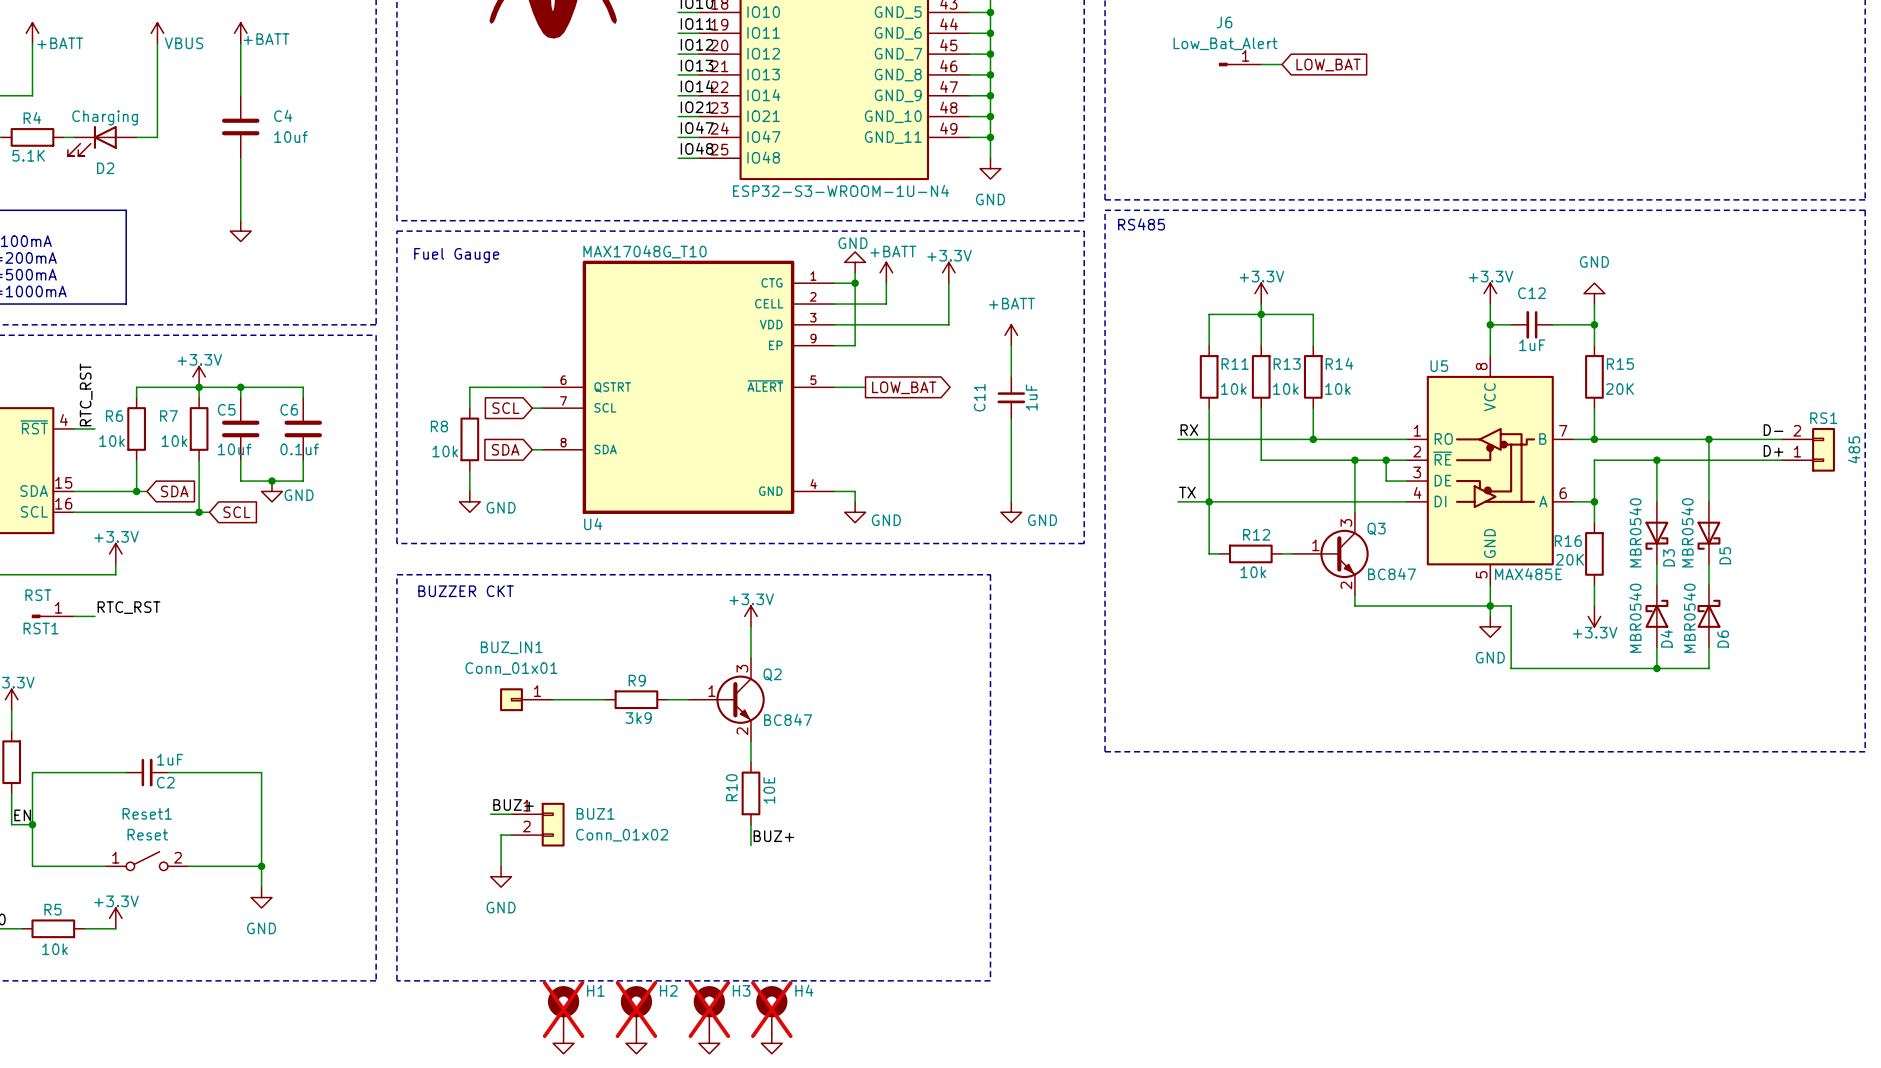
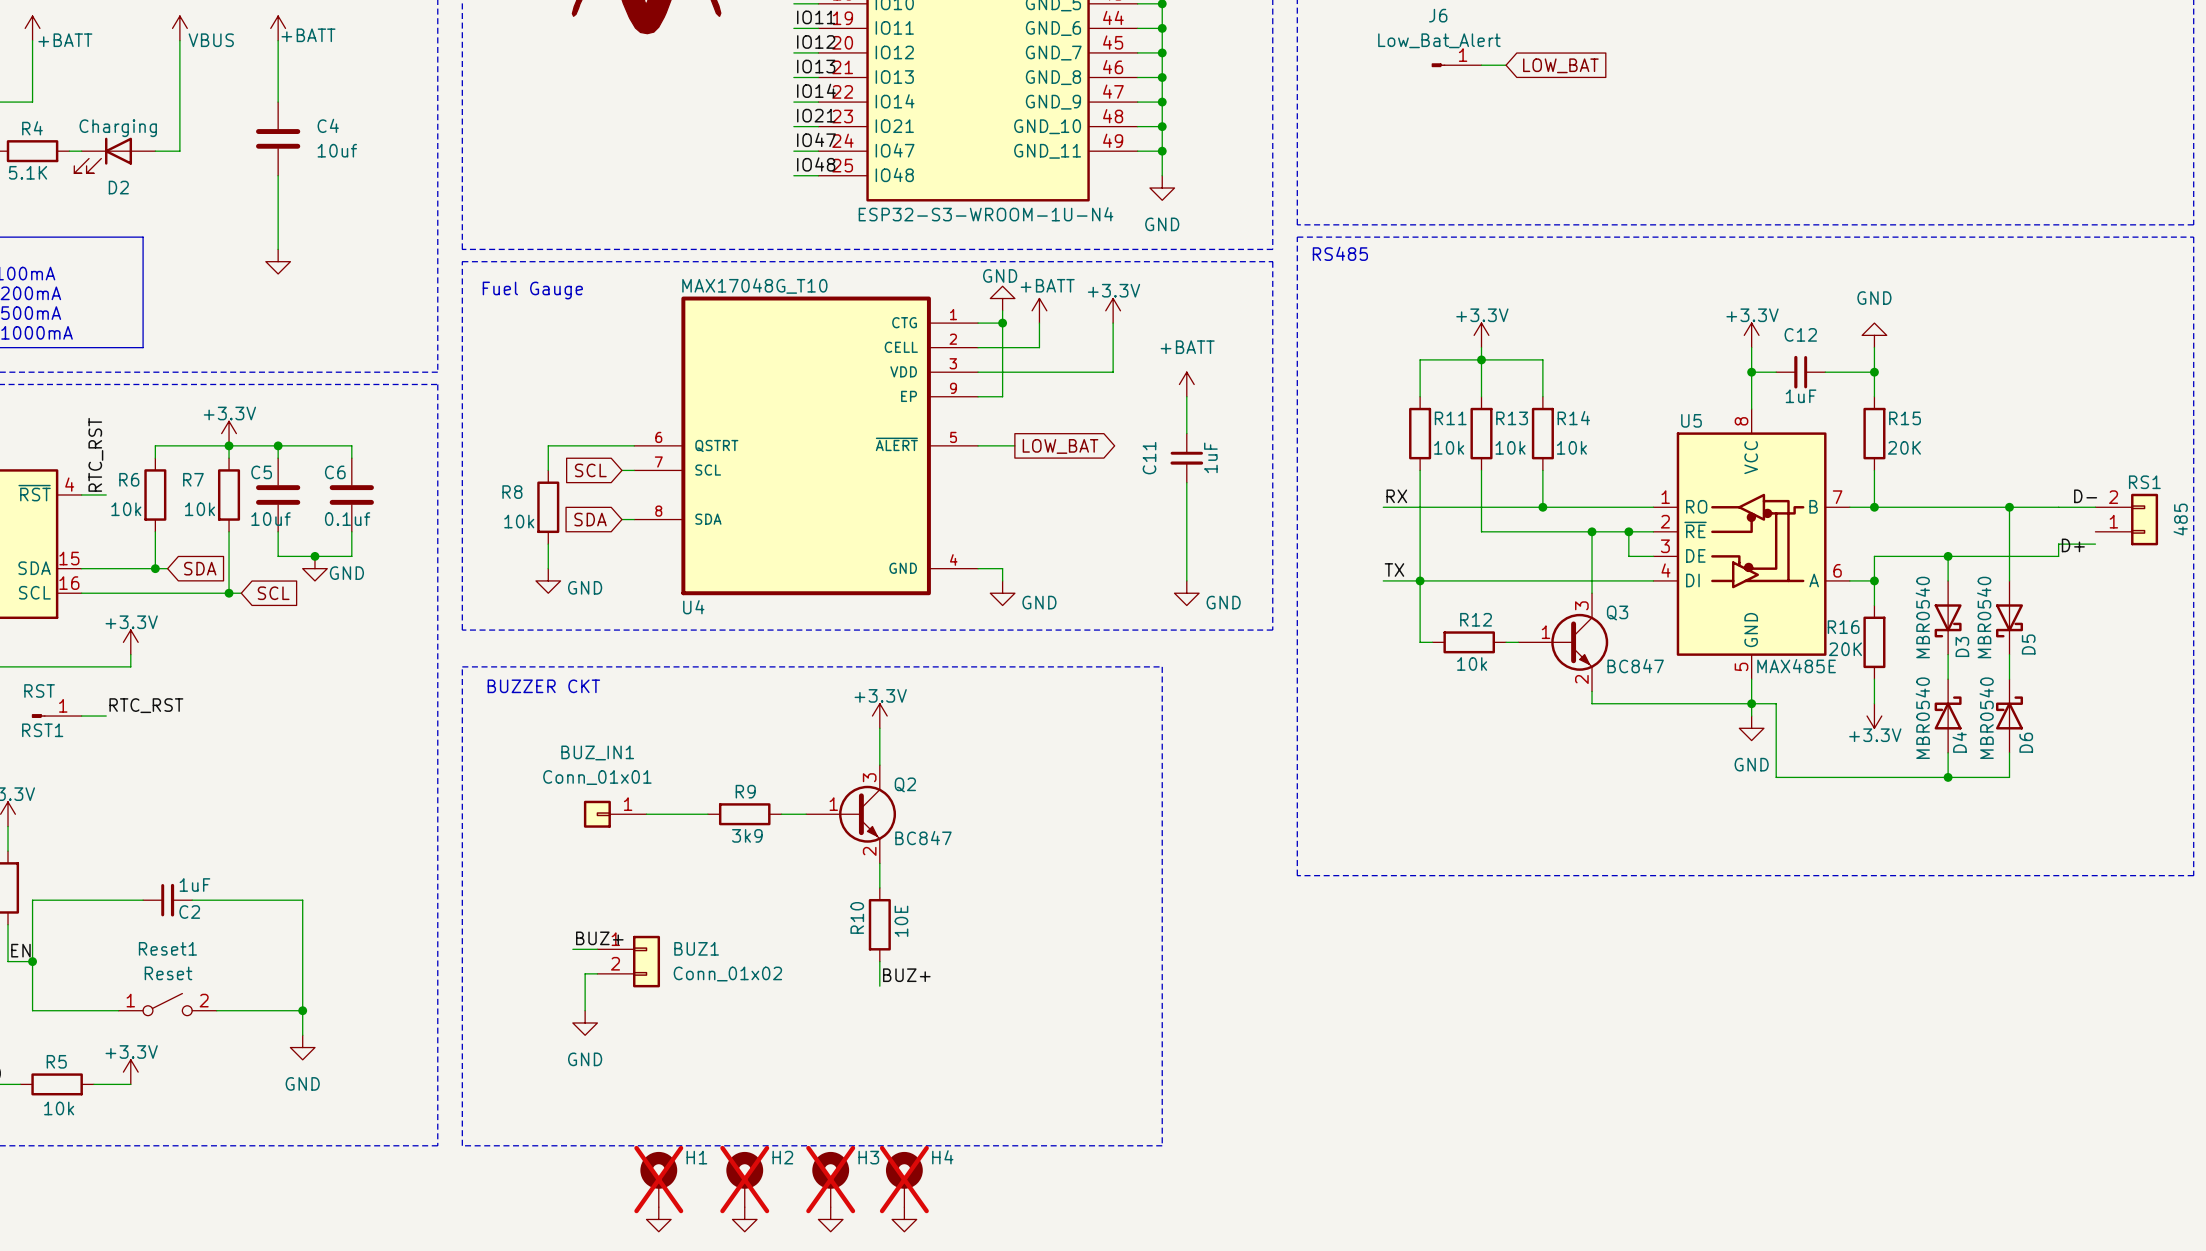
label position: D+ (1773, 450) -> D+ (2073, 545)
wire: (1656, 460) (1656, 481) -> none
junction position: (1656, 460) -> (1948, 556)
wire: (1781, 460) (1594, 460) (1594, 481) -> (2095, 544) (2058, 544) (2058, 556) (1874, 556)

